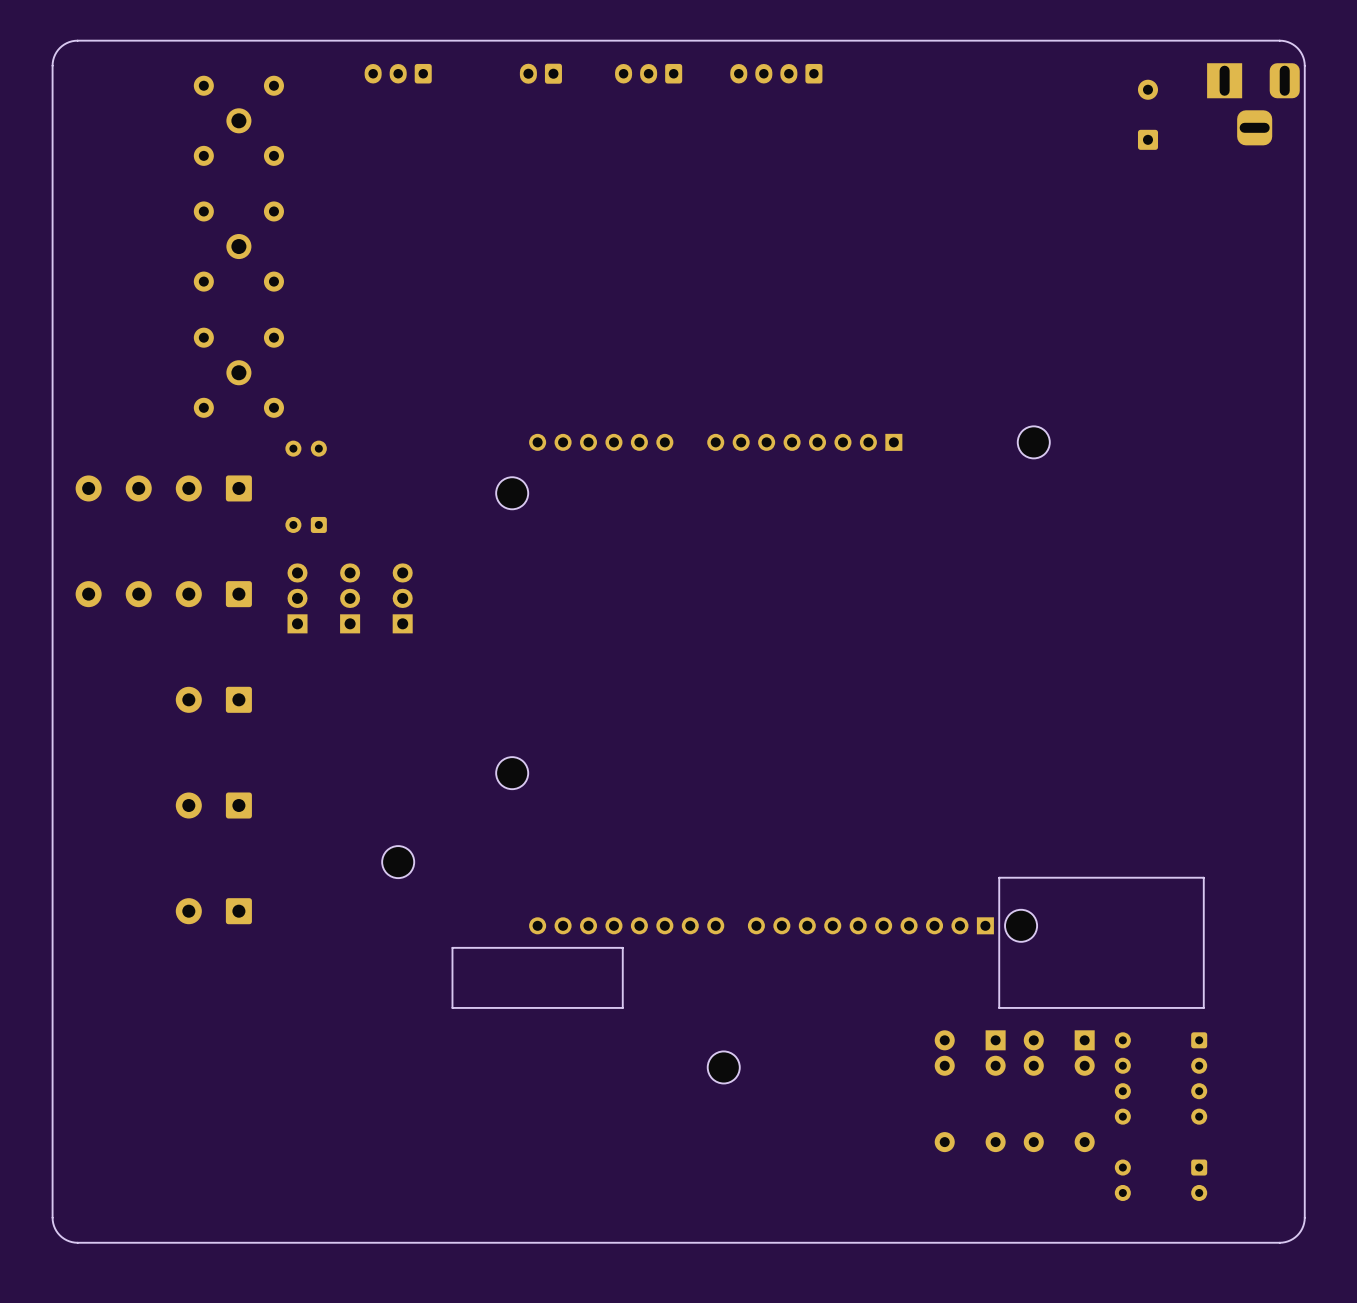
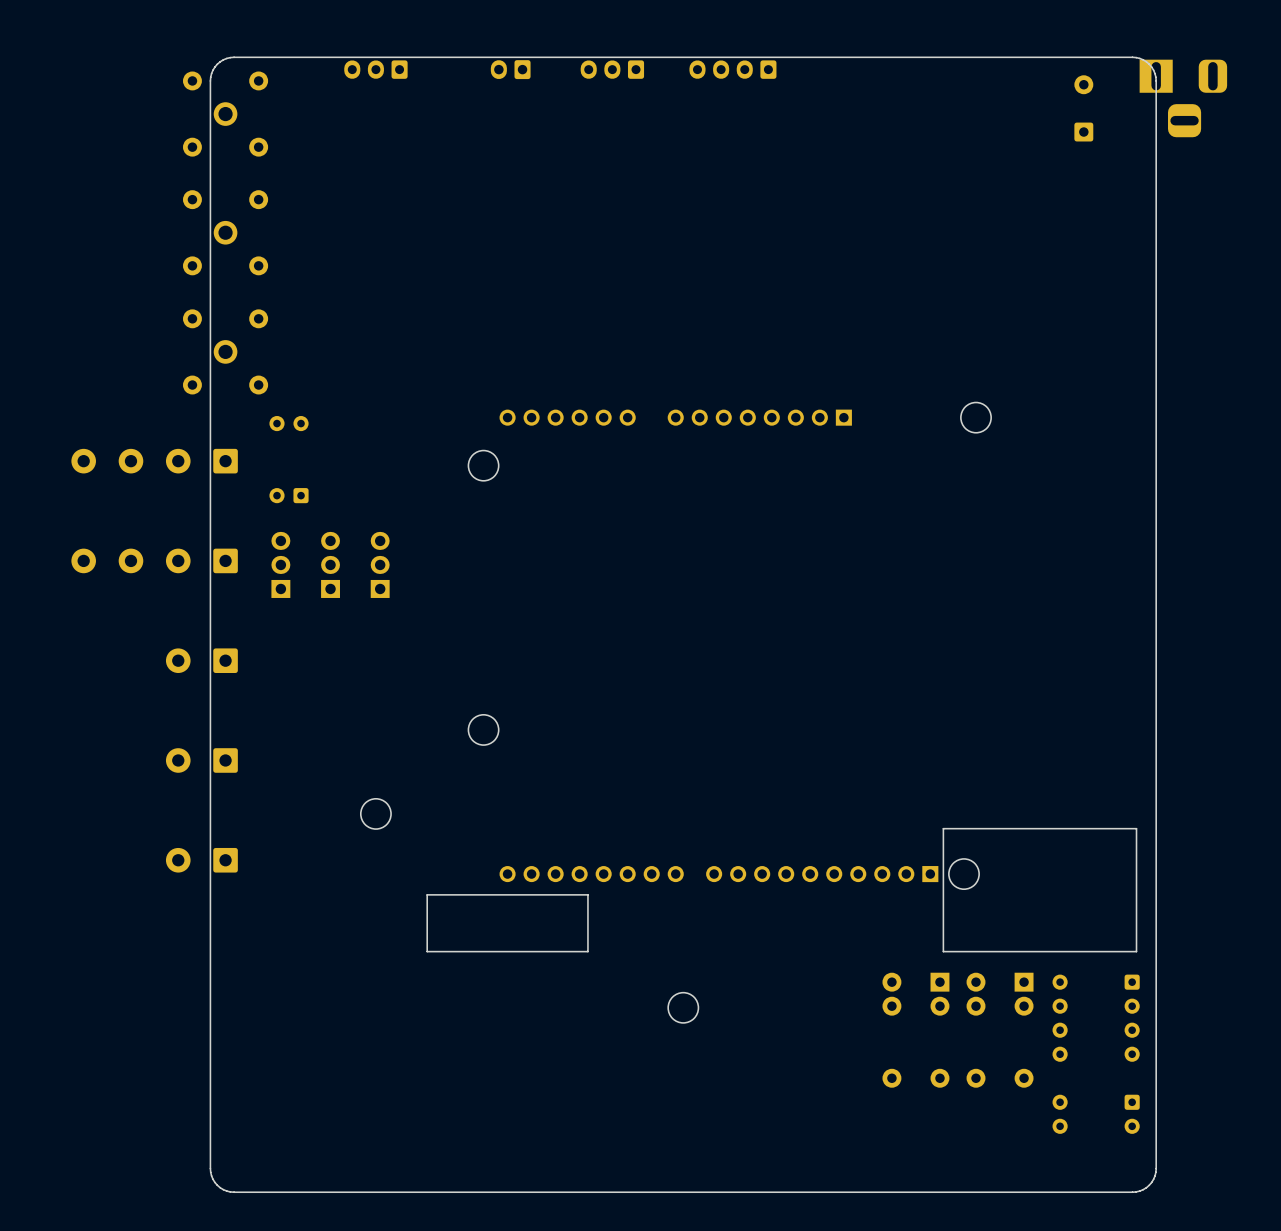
board edge: (1279, 40) (77, 40) (69, 42) (59, 48) (55, 54) (52, 65) (52, 1217) (55, 1228) (59, 1235) (69, 1241) (77, 1242) (1279, 1242) (1287, 1241) (1297, 1235) (1303, 1225) (1304, 1217) (1304, 65) (1302, 54) (1297, 48) (1287, 42) (1279, 40) -> (1132, 57) (1143, 59) (1149, 64) (1153, 70) (1156, 80) (1156, 1168) (1151, 1182) (1143, 1189) (1132, 1192) (234, 1192) (220, 1187) (213, 1179) (210, 1168) (210, 80) (214, 67) (223, 59) (234, 57) (1132, 57)

